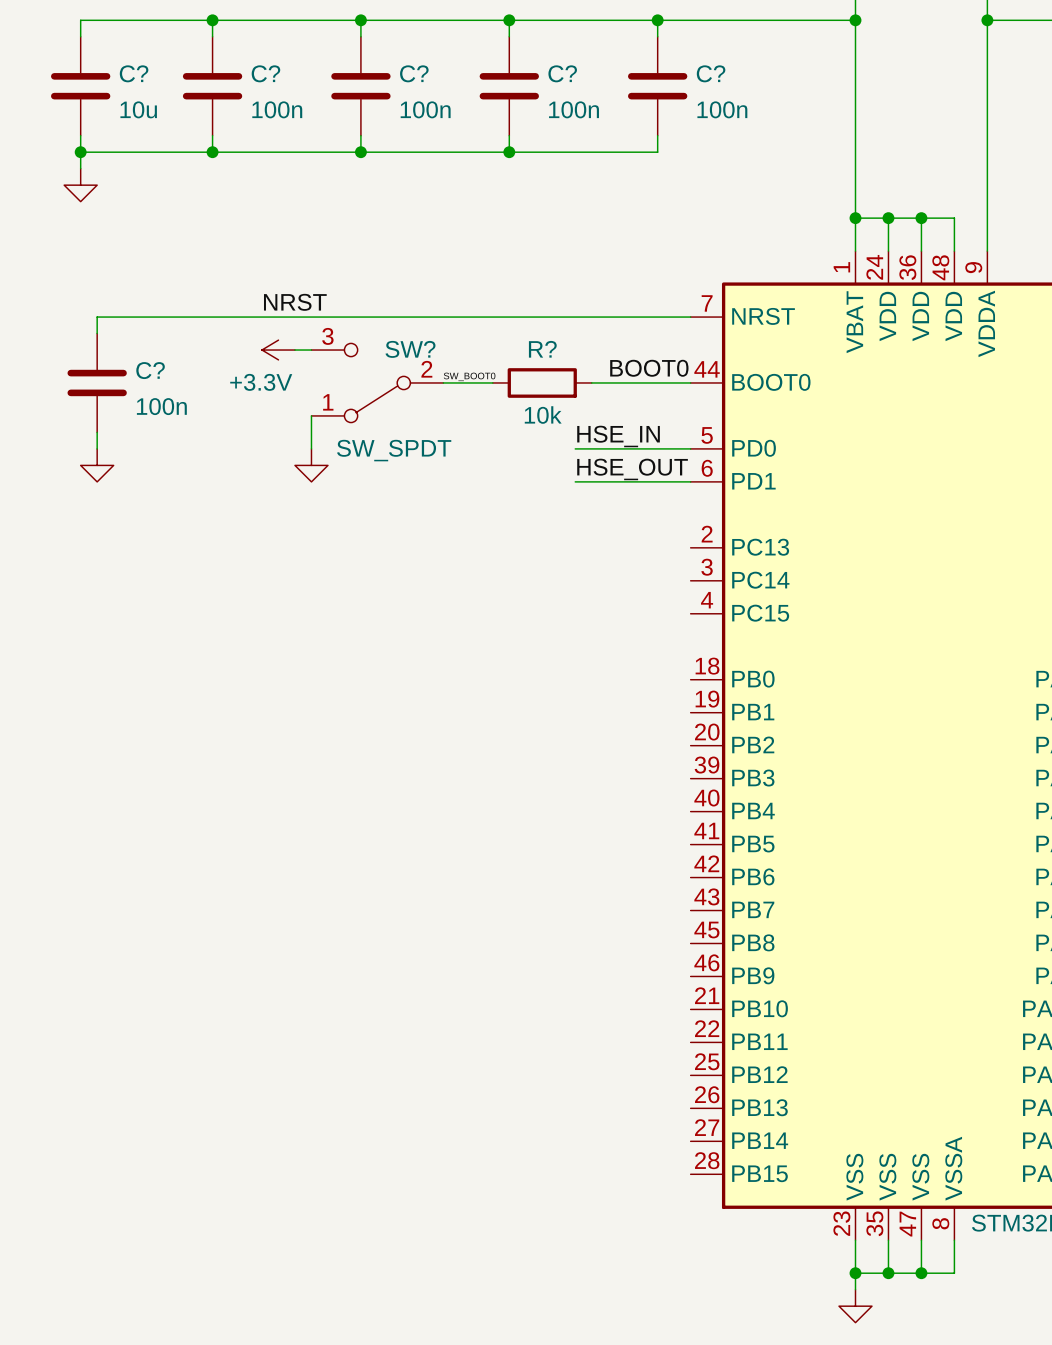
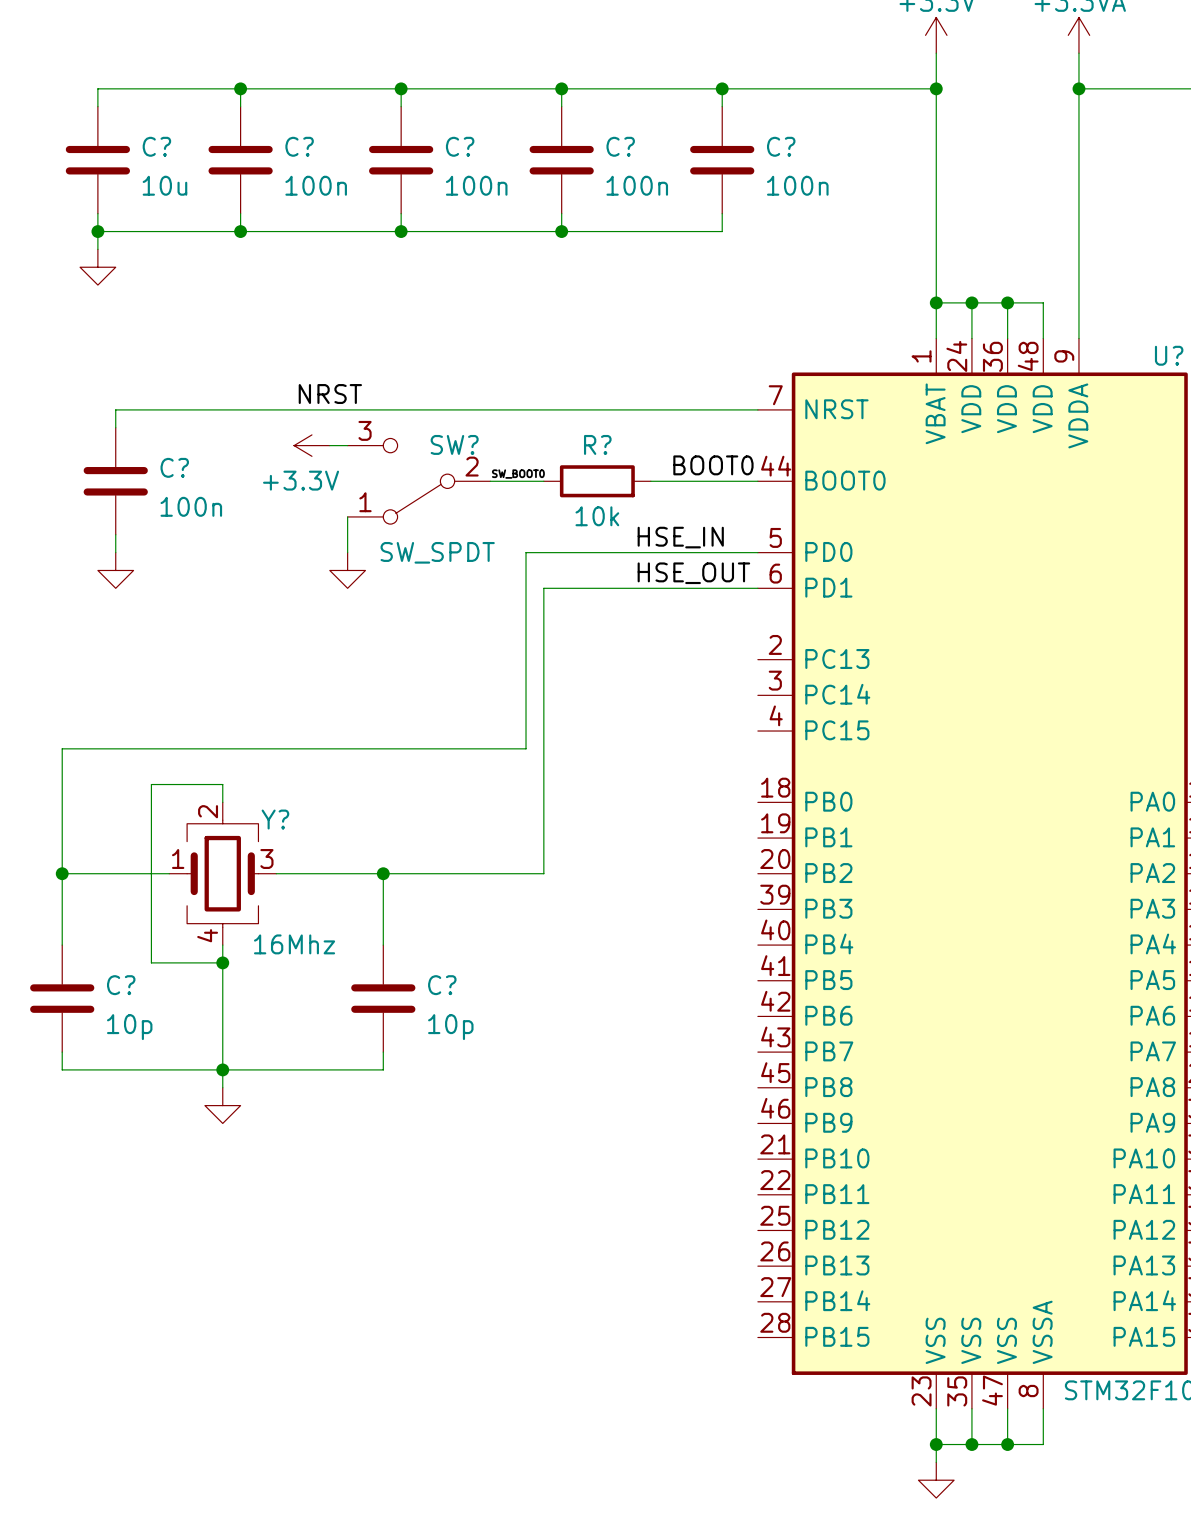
wire: none -> (633, 552) (526, 552) (526, 748) (62, 748) (62, 945)
wire: none -> (633, 588) (543, 588) (543, 873) (276, 873)
wire: none -> (222, 802) (222, 784) (151, 784) (151, 962) (222, 962)
wire: none -> (62, 873) (169, 873)
junction: none -> (62, 873)
Y?: none -> 16Mhz (222, 873)
wire: none -> (383, 873) (383, 945)
junction: none -> (383, 873)
wire: none -> (222, 945) (222, 1087)
junction: none -> (222, 962)
C?: none -> 10p (62, 998)
C?: none -> 10p (383, 998)
wire: none -> (62, 1052) (62, 1069) (383, 1069) (383, 1052)
junction: none -> (222, 1069)
power symbol: none -> (222, 1105)

